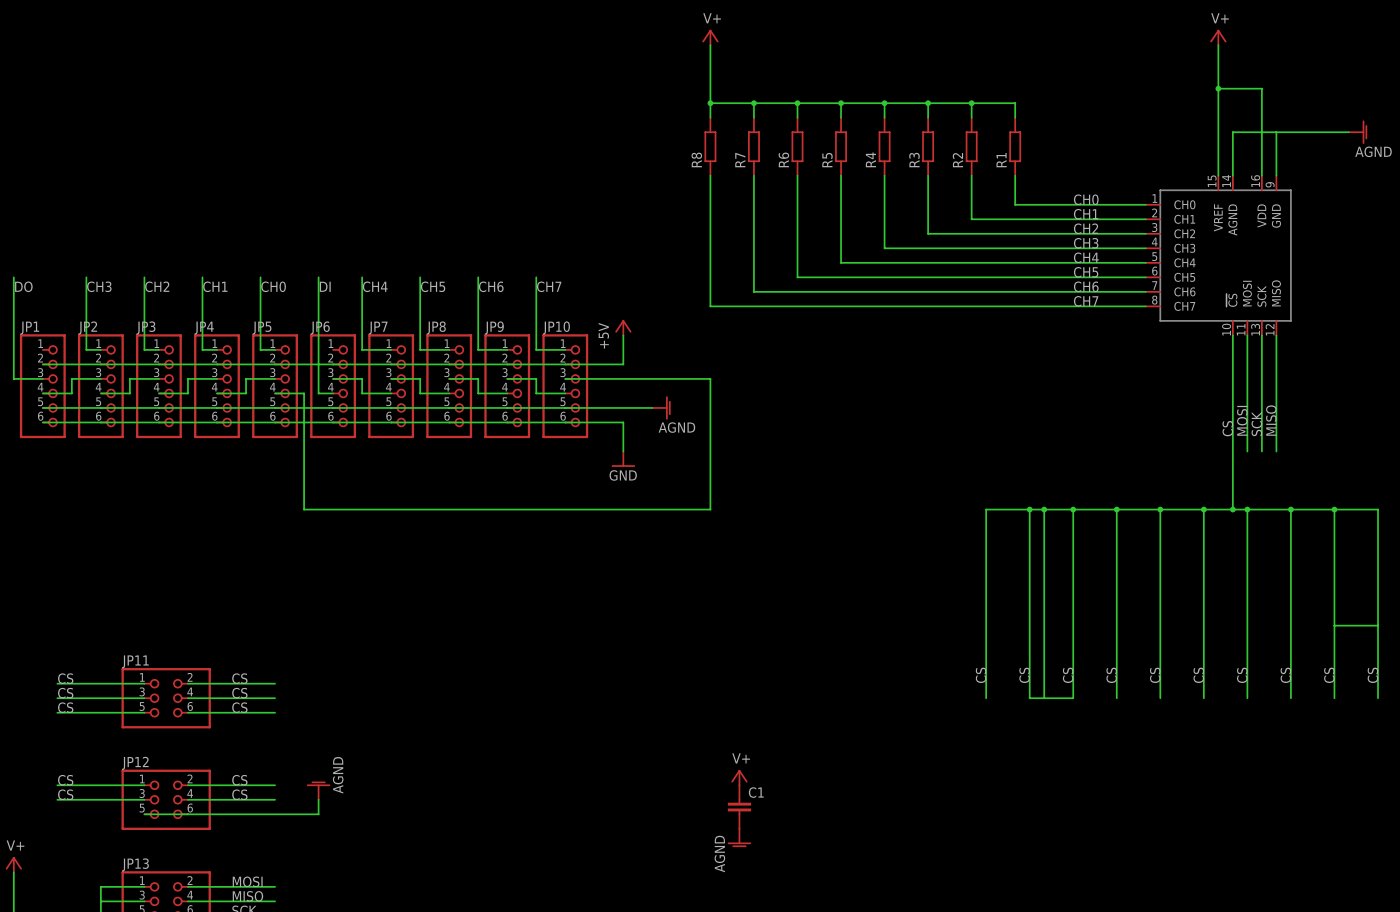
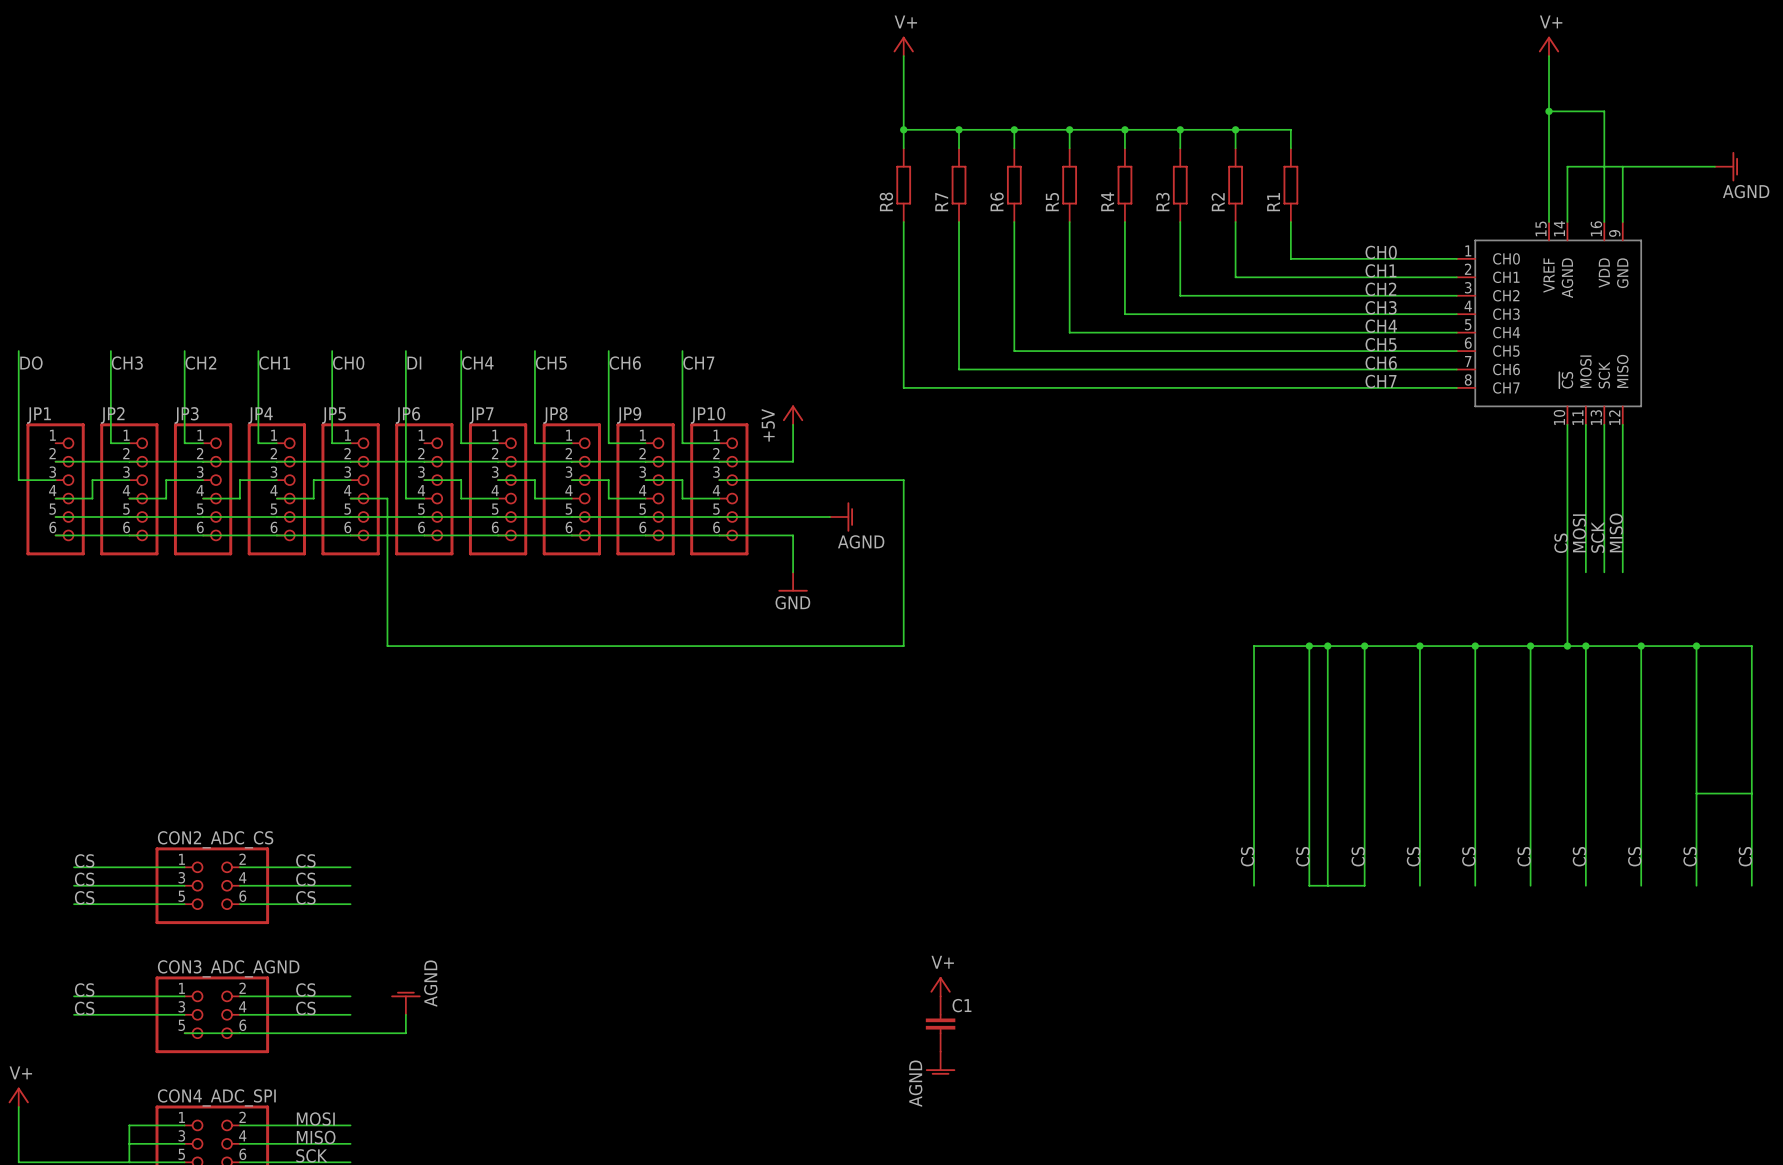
JP11 name: JP11 (135, 661) -> CON2_ADC_CS (215, 839)
JP12 name: JP12 (135, 763) -> CON3_ADC_AGND (228, 968)
JP13 name: JP13 (135, 864) -> CON4_ADC_SPI (216, 1097)

